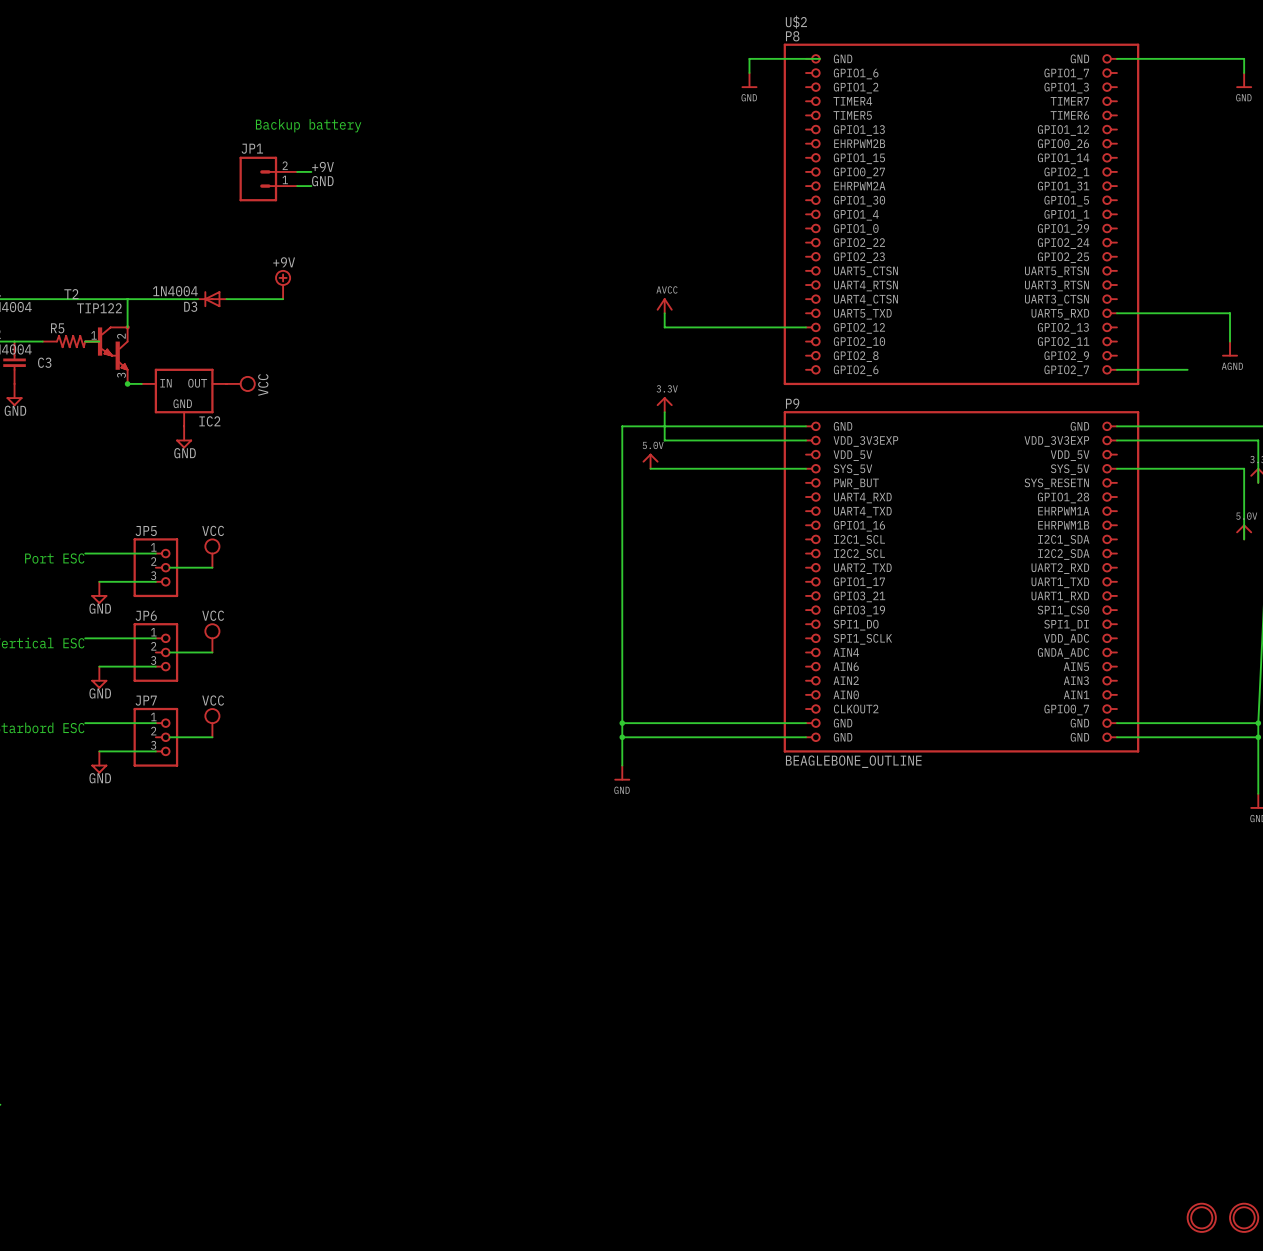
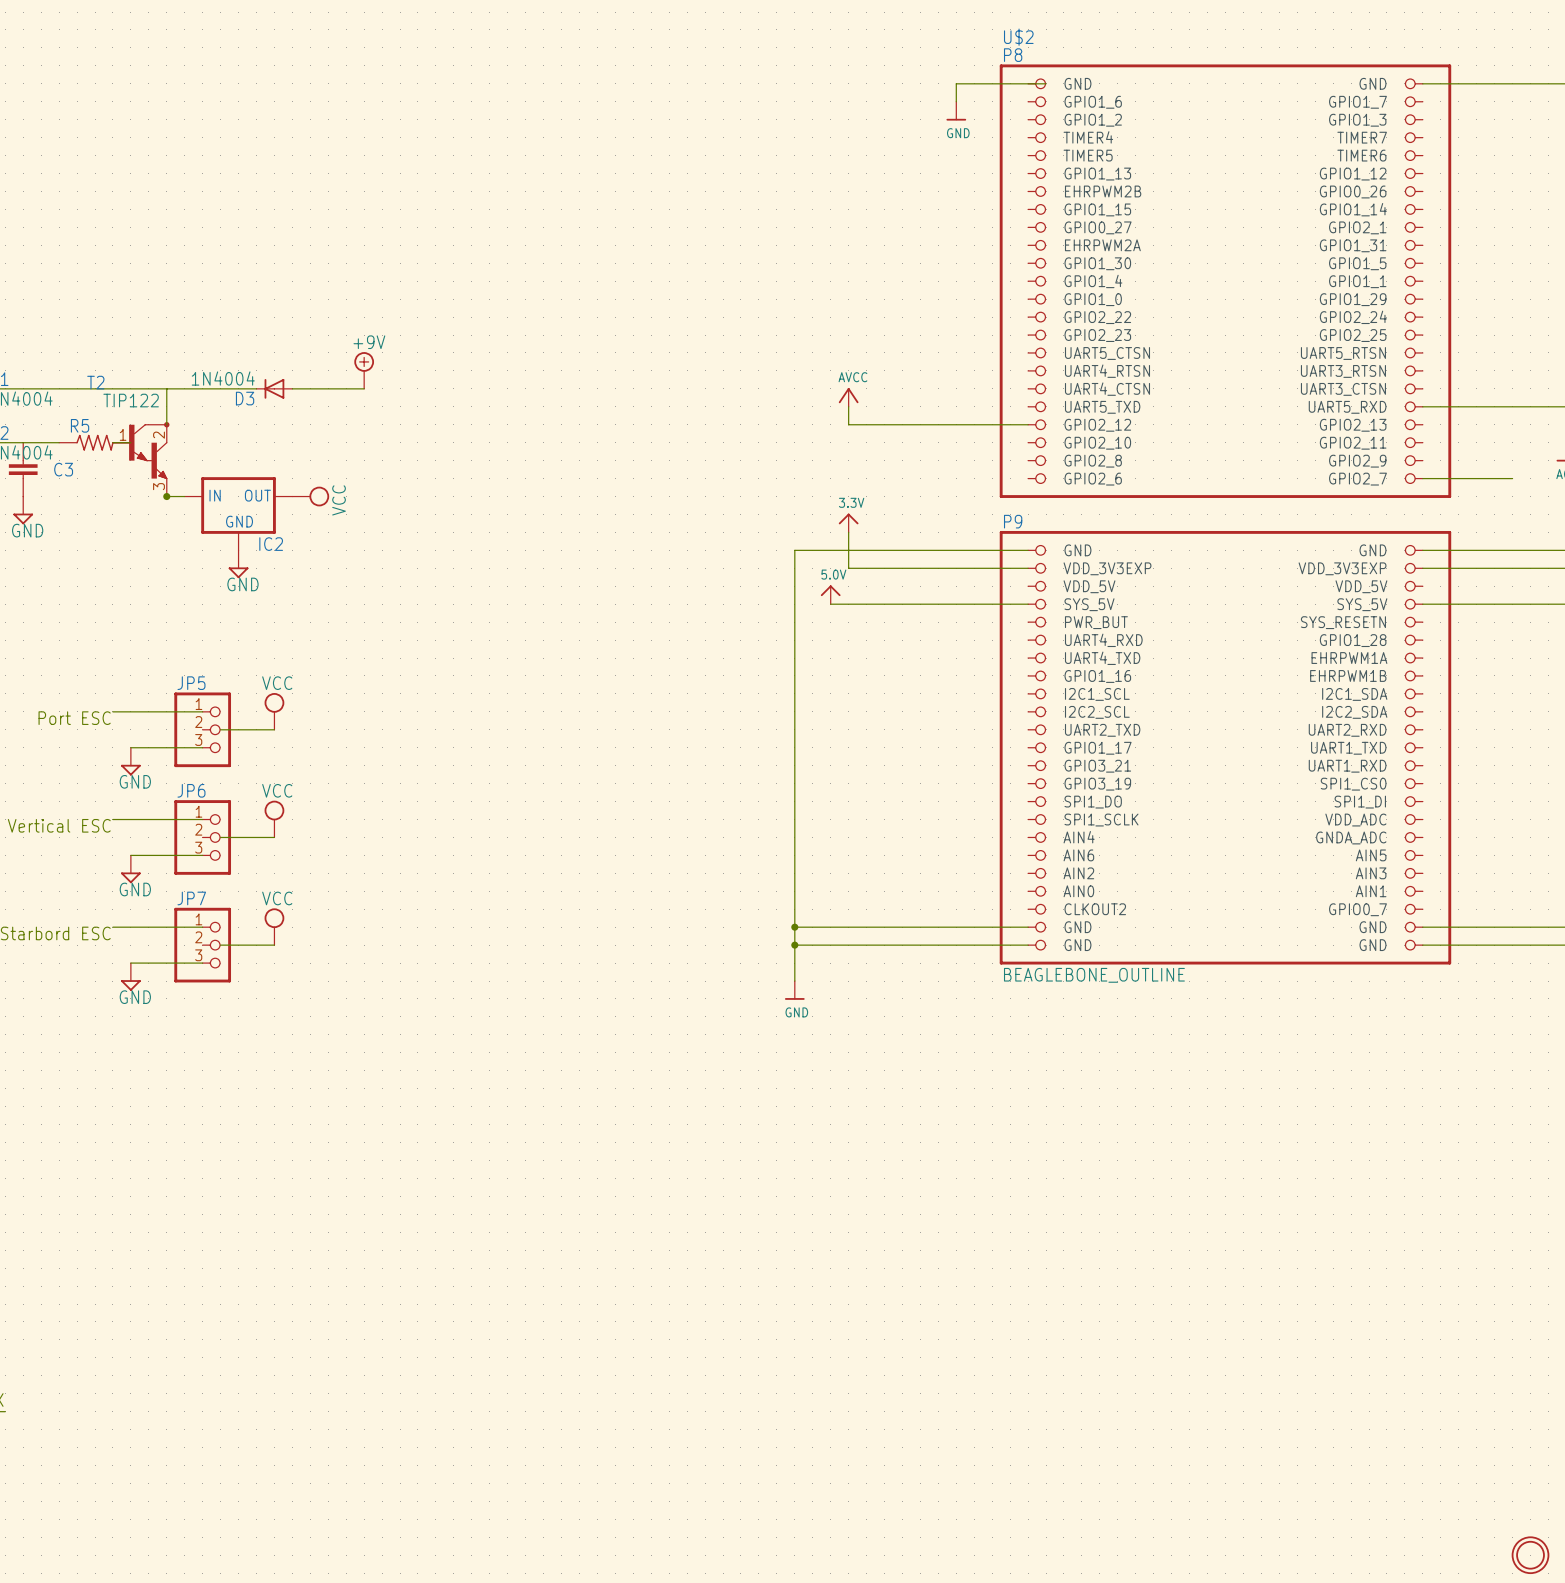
text: Backup battery (308, 125) -> none
label: +9V (322, 166) -> none
wire: (297, 171) (311, 171) -> none
JP1: (268, 179) -> none
label: GND (322, 181) -> none
wire: (297, 186) (311, 186) -> none

